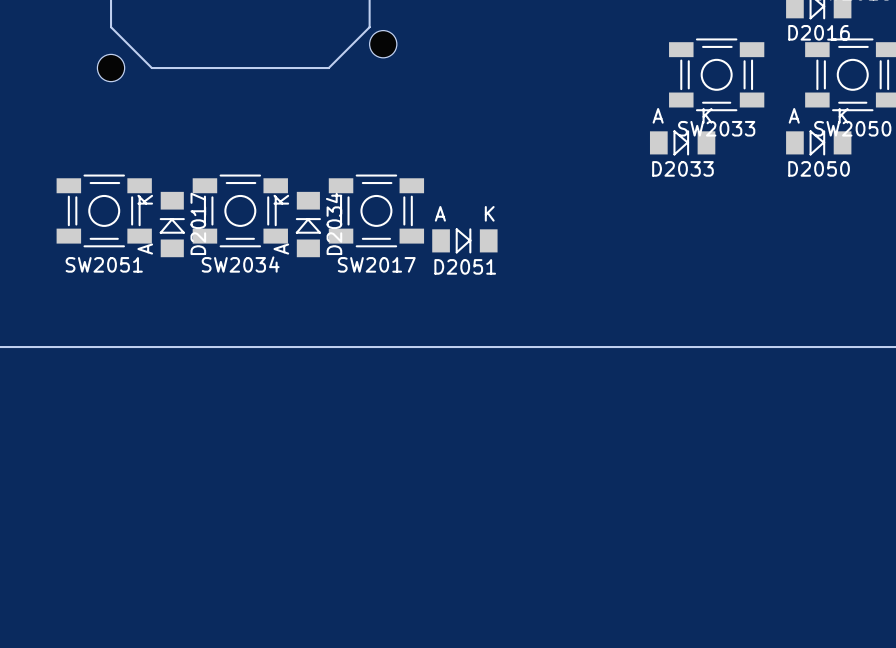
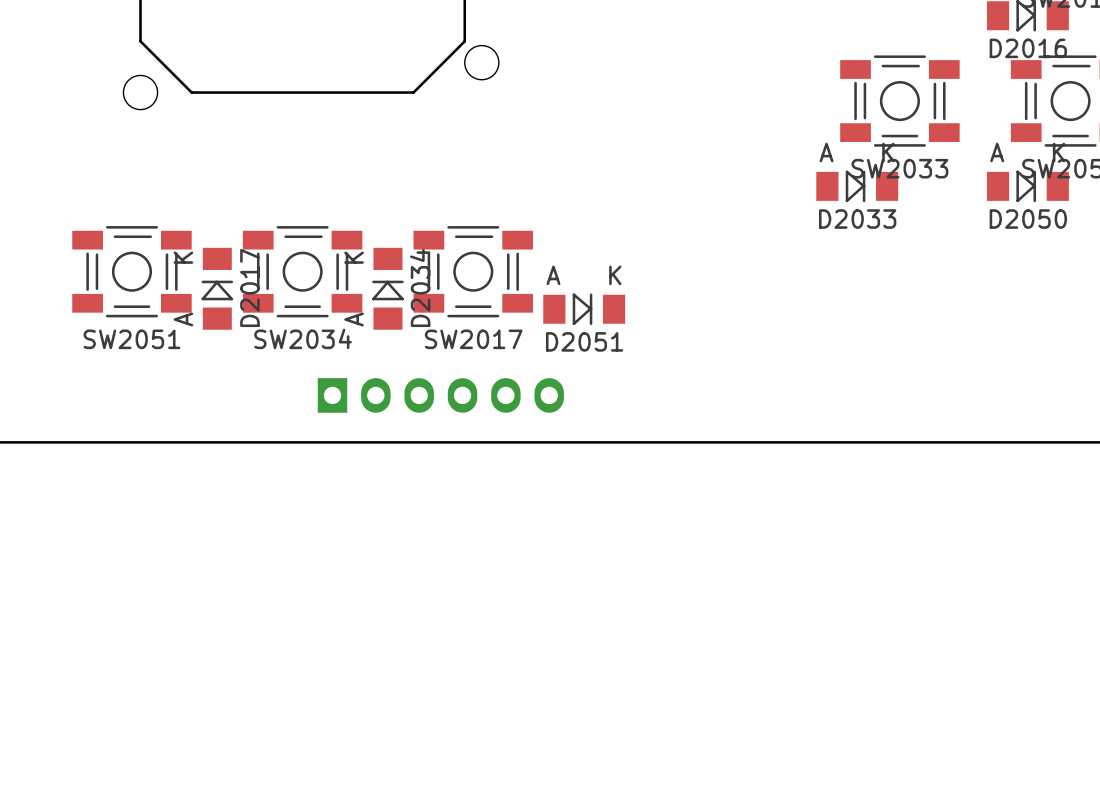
part: none -> (440, 395)

